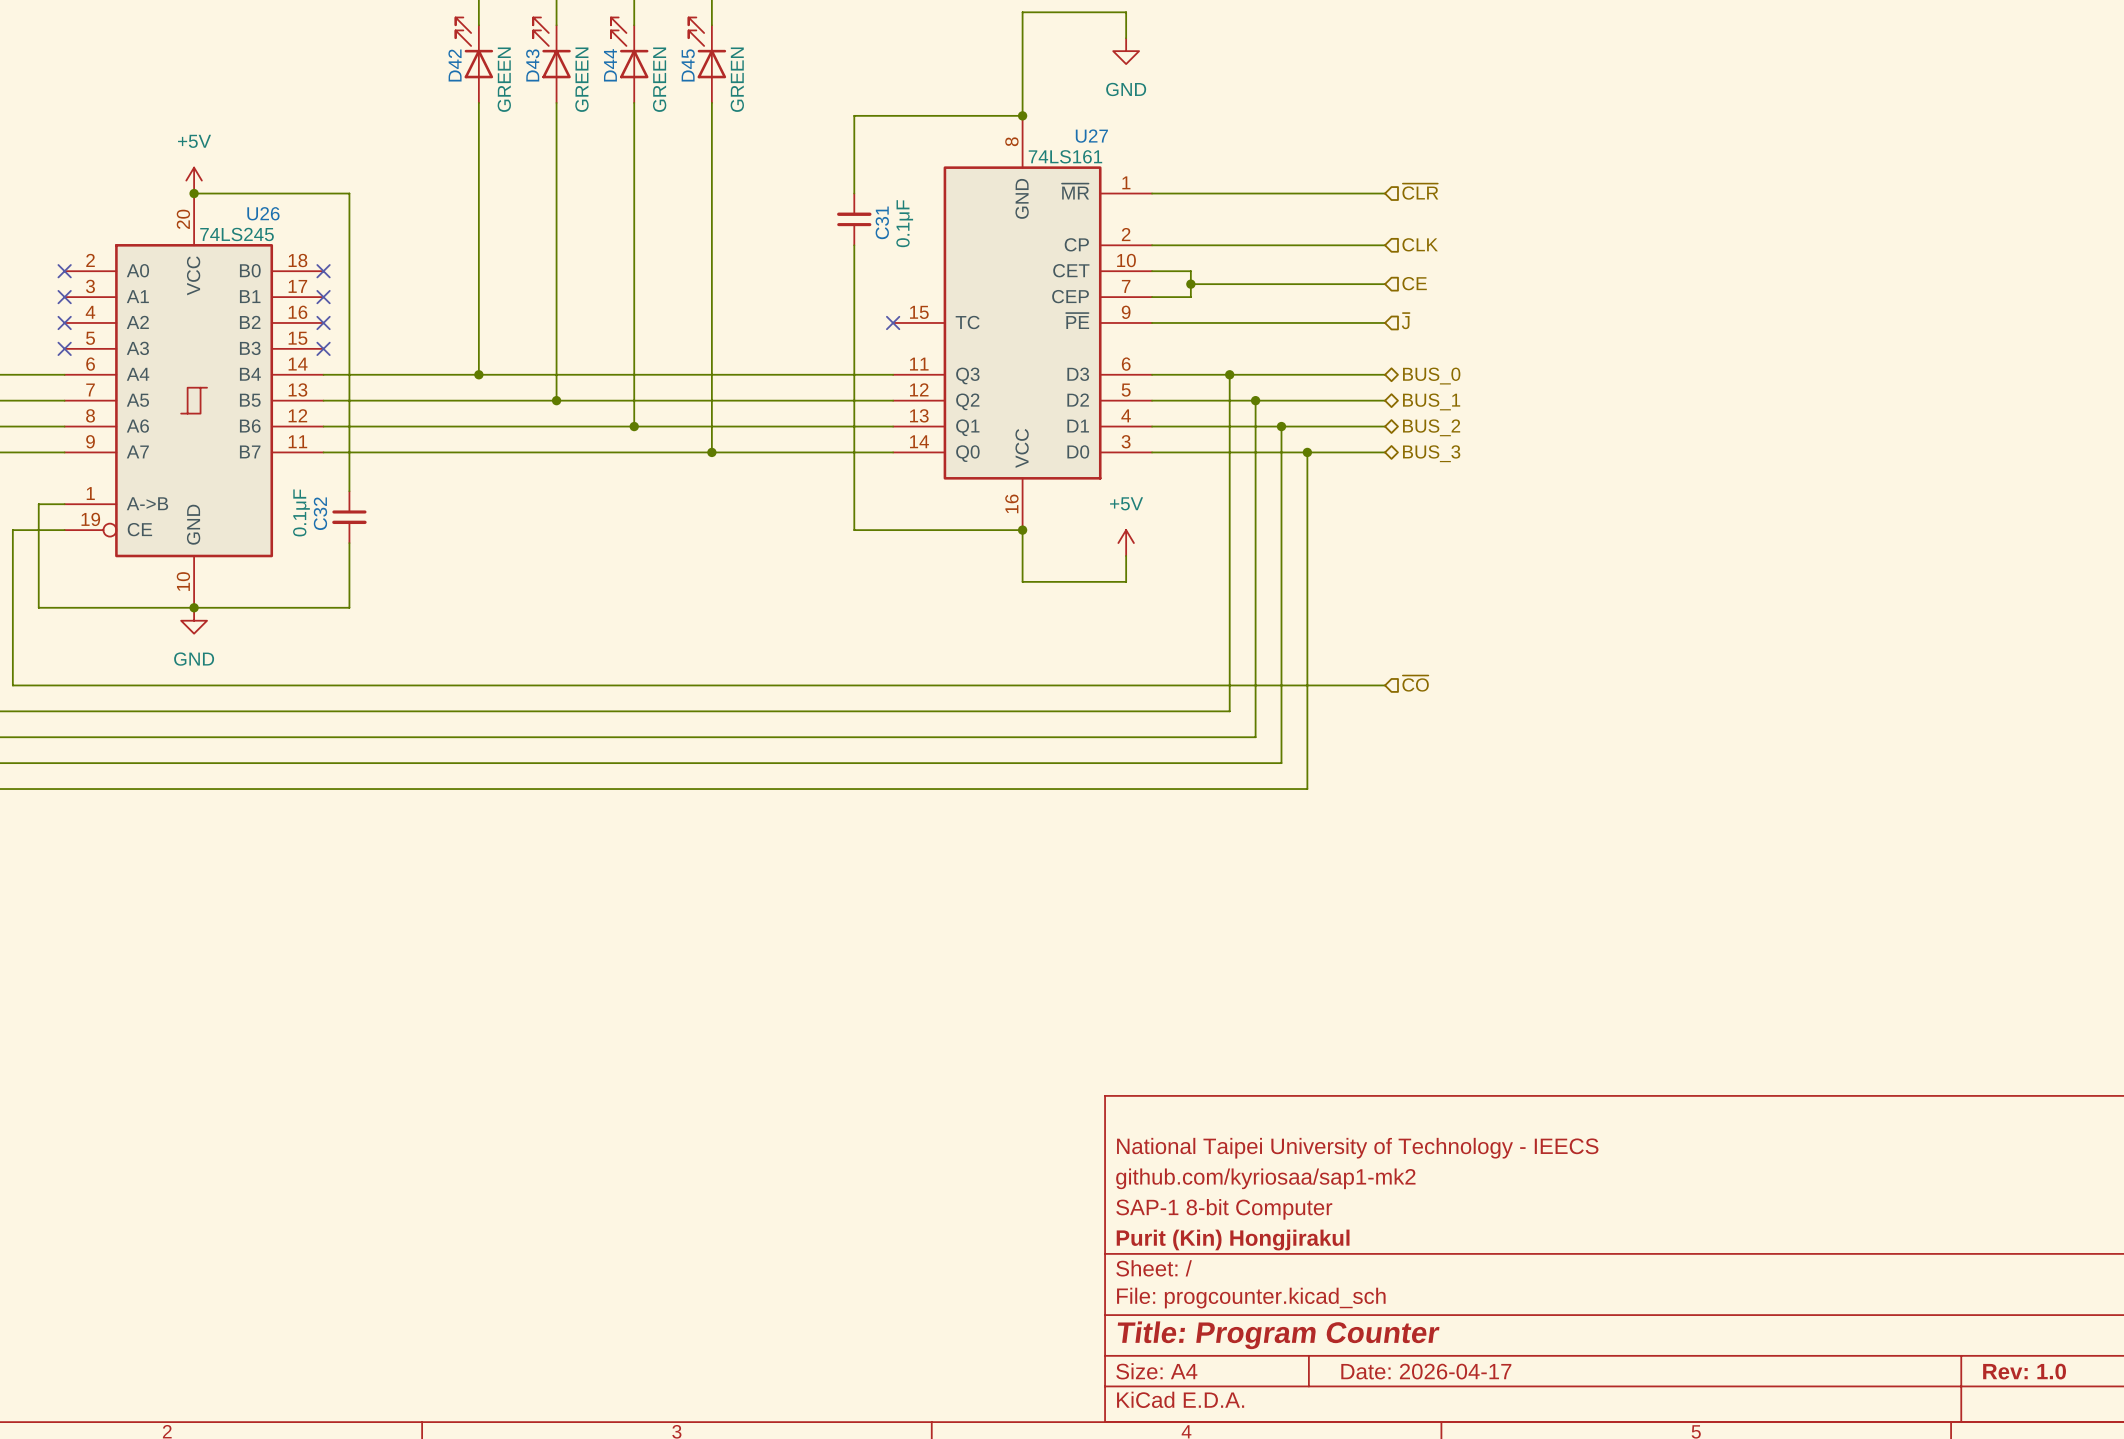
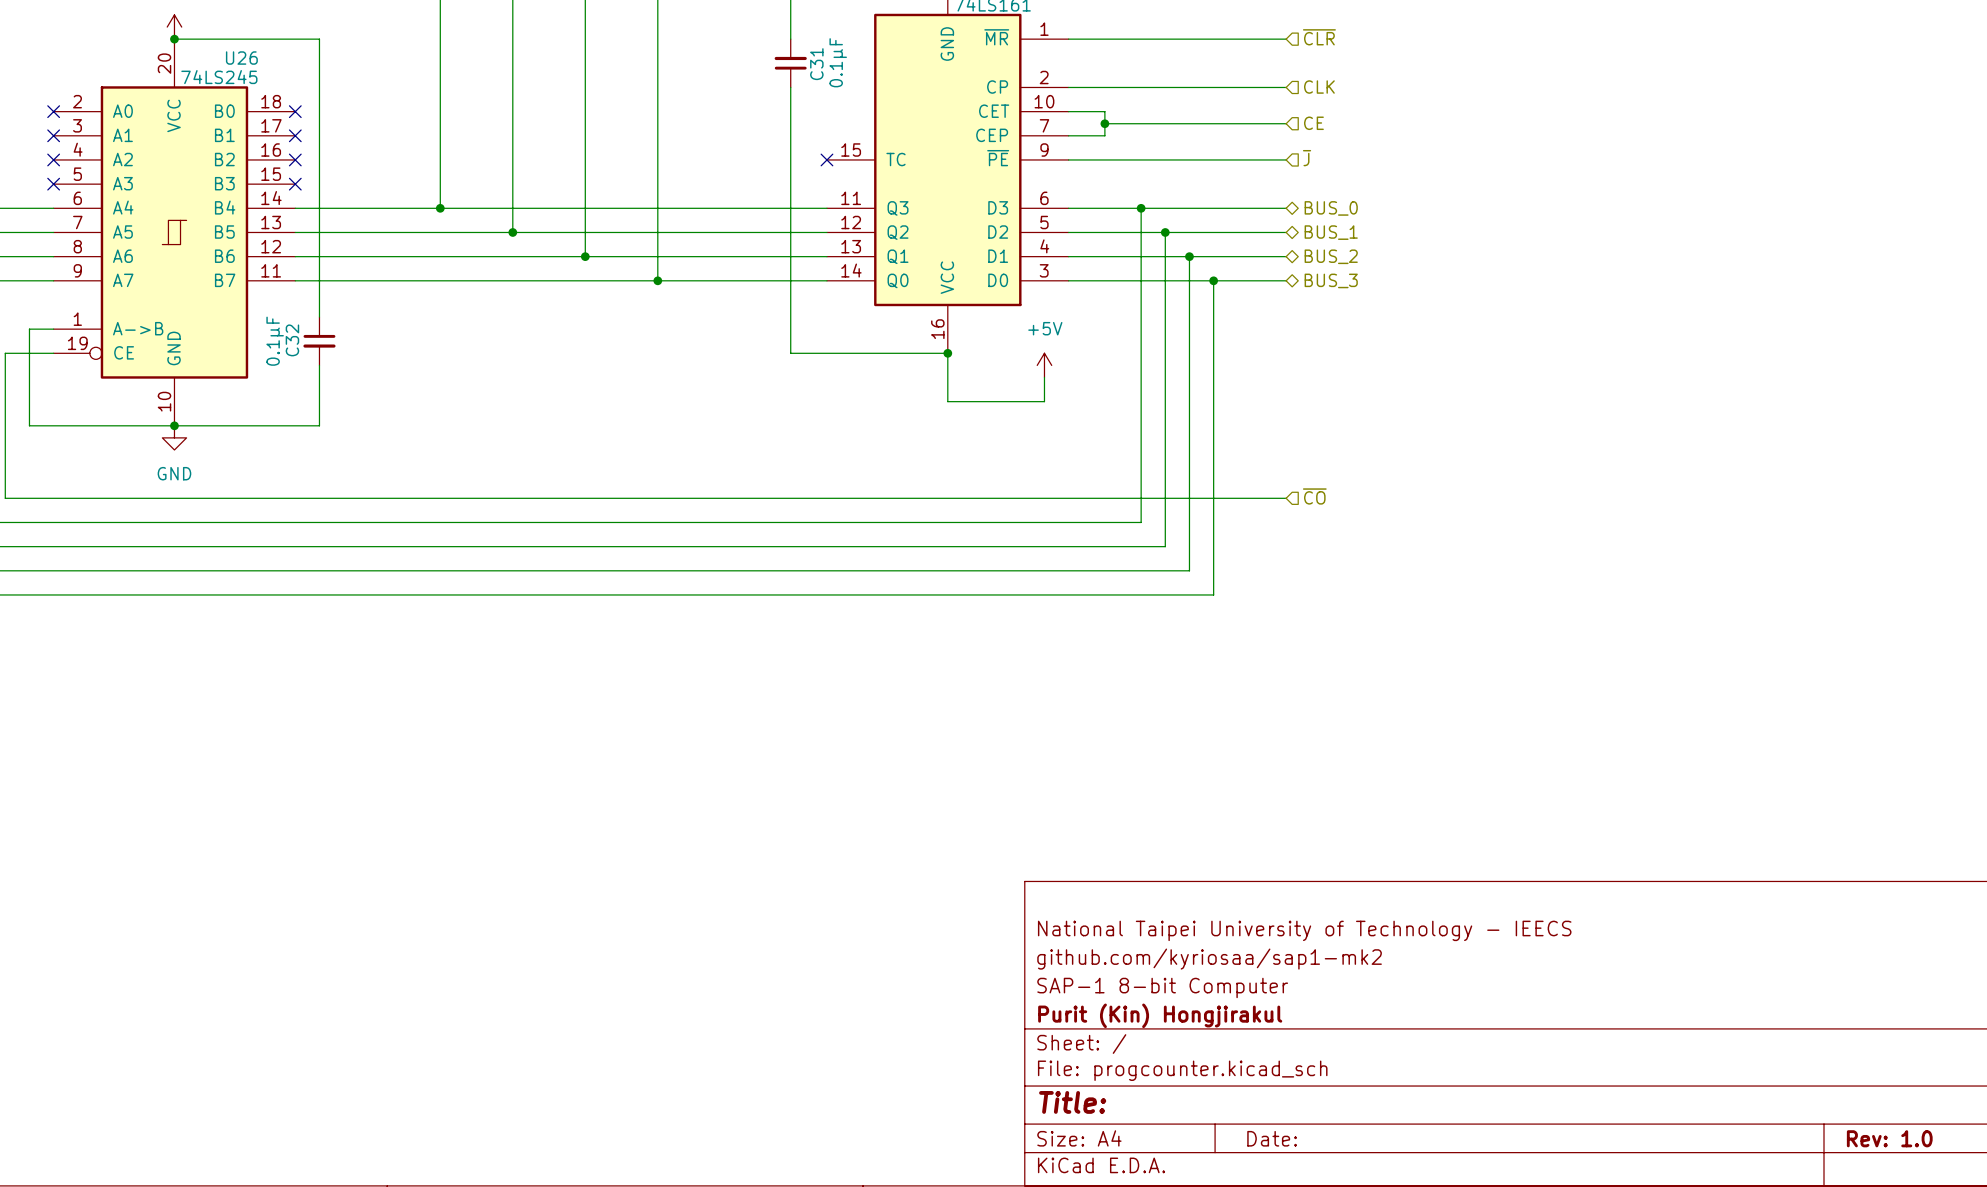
title block: Title: Program Counter (1278, 1335) -> Title: (1072, 1102)
title block: Date: 2026-04-17 (1426, 1371) -> Date: (1272, 1138)

